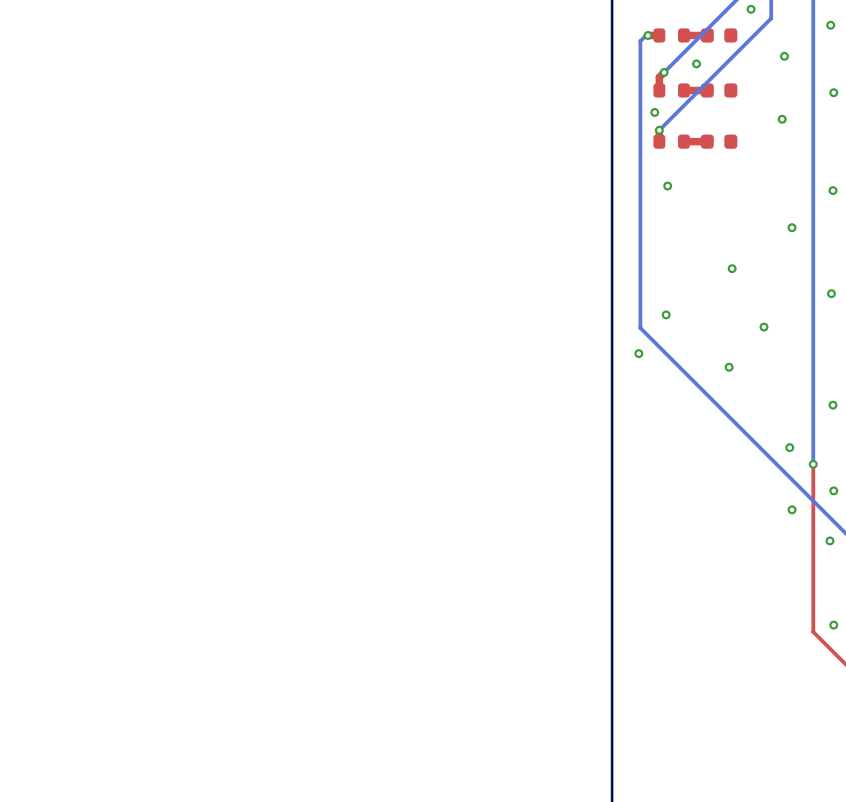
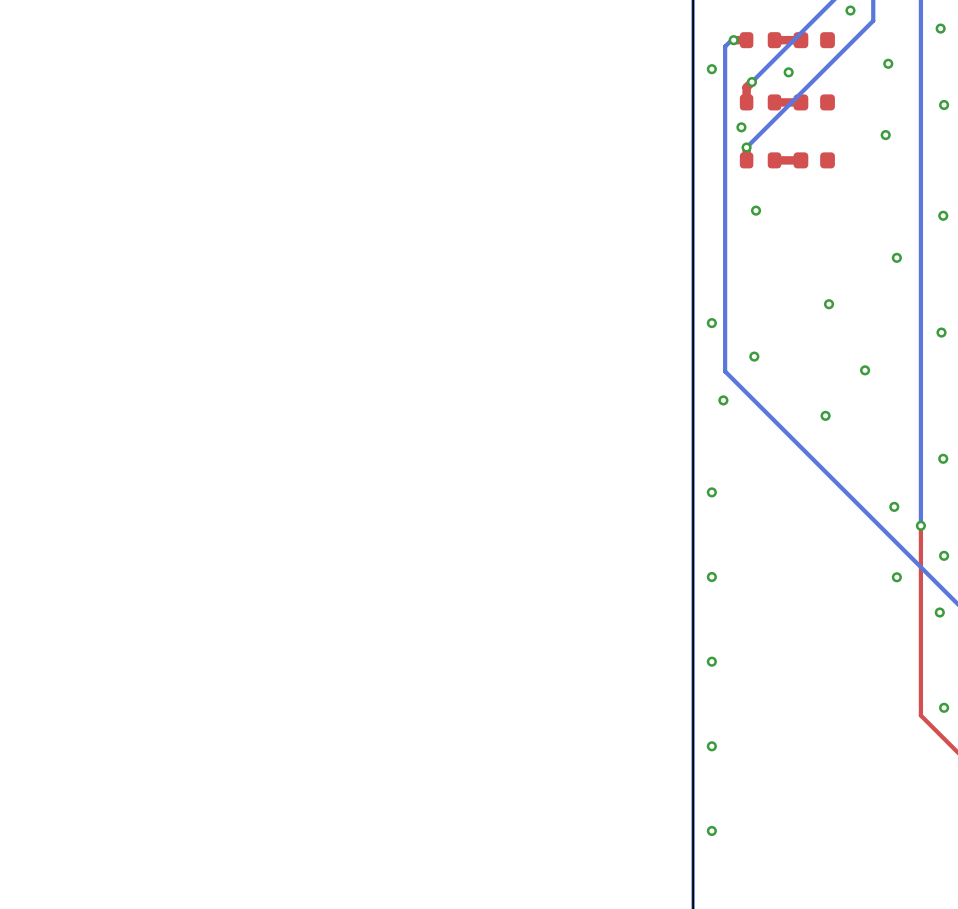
via: none -> (711, 69)
via: none -> (711, 323)
via: none -> (711, 492)
via: none -> (711, 577)
via: none -> (711, 661)
via: none -> (711, 746)
via: none -> (711, 830)

